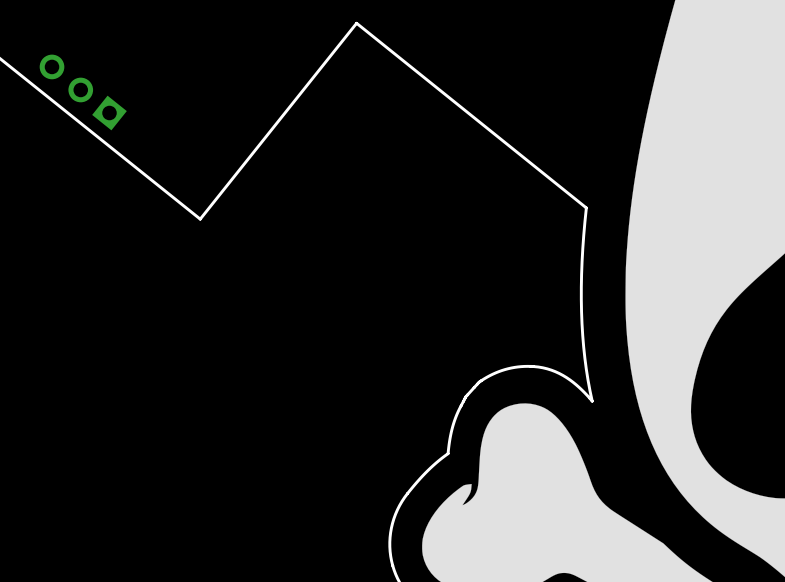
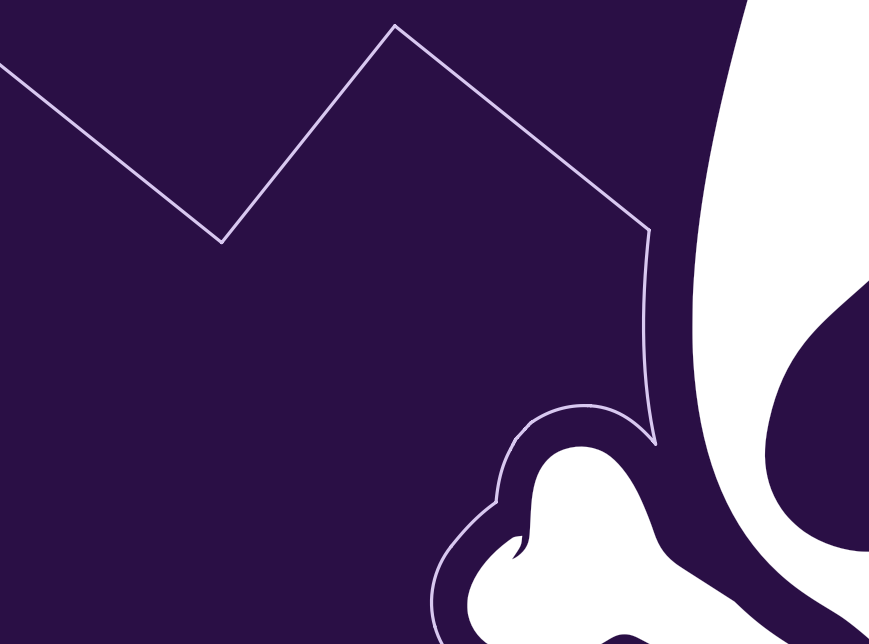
part: (83, 92) -> none

